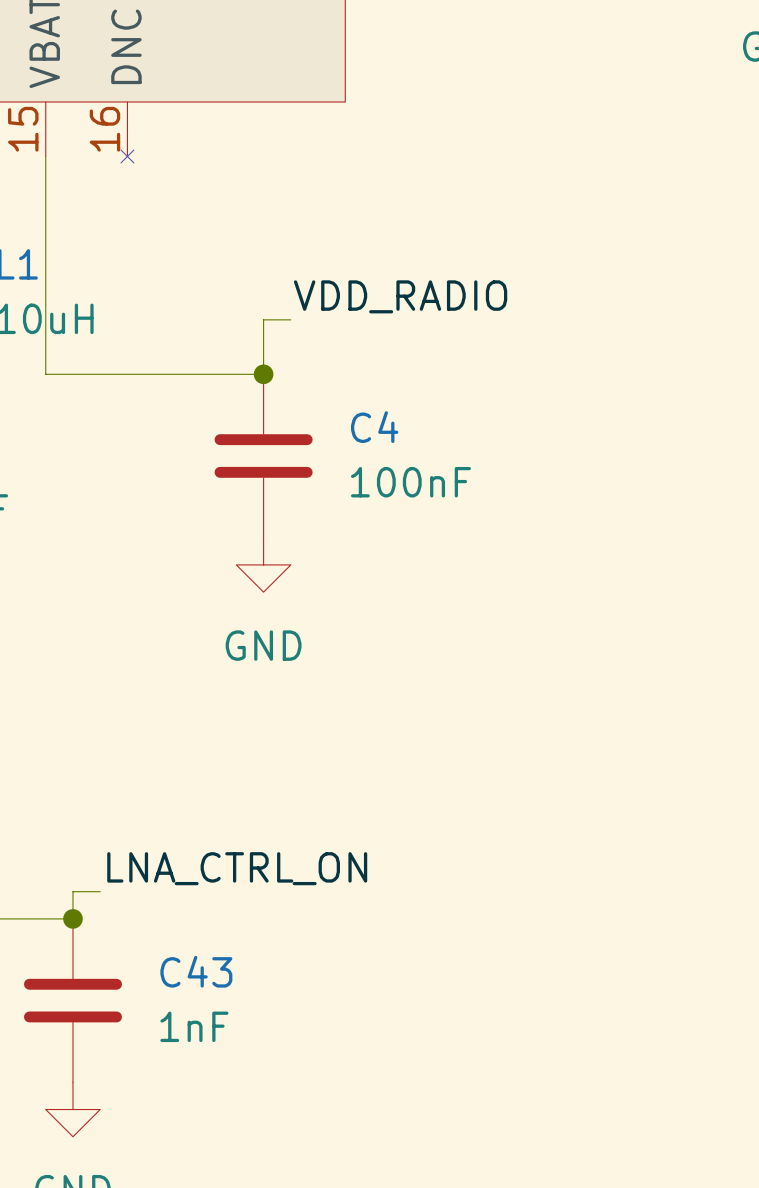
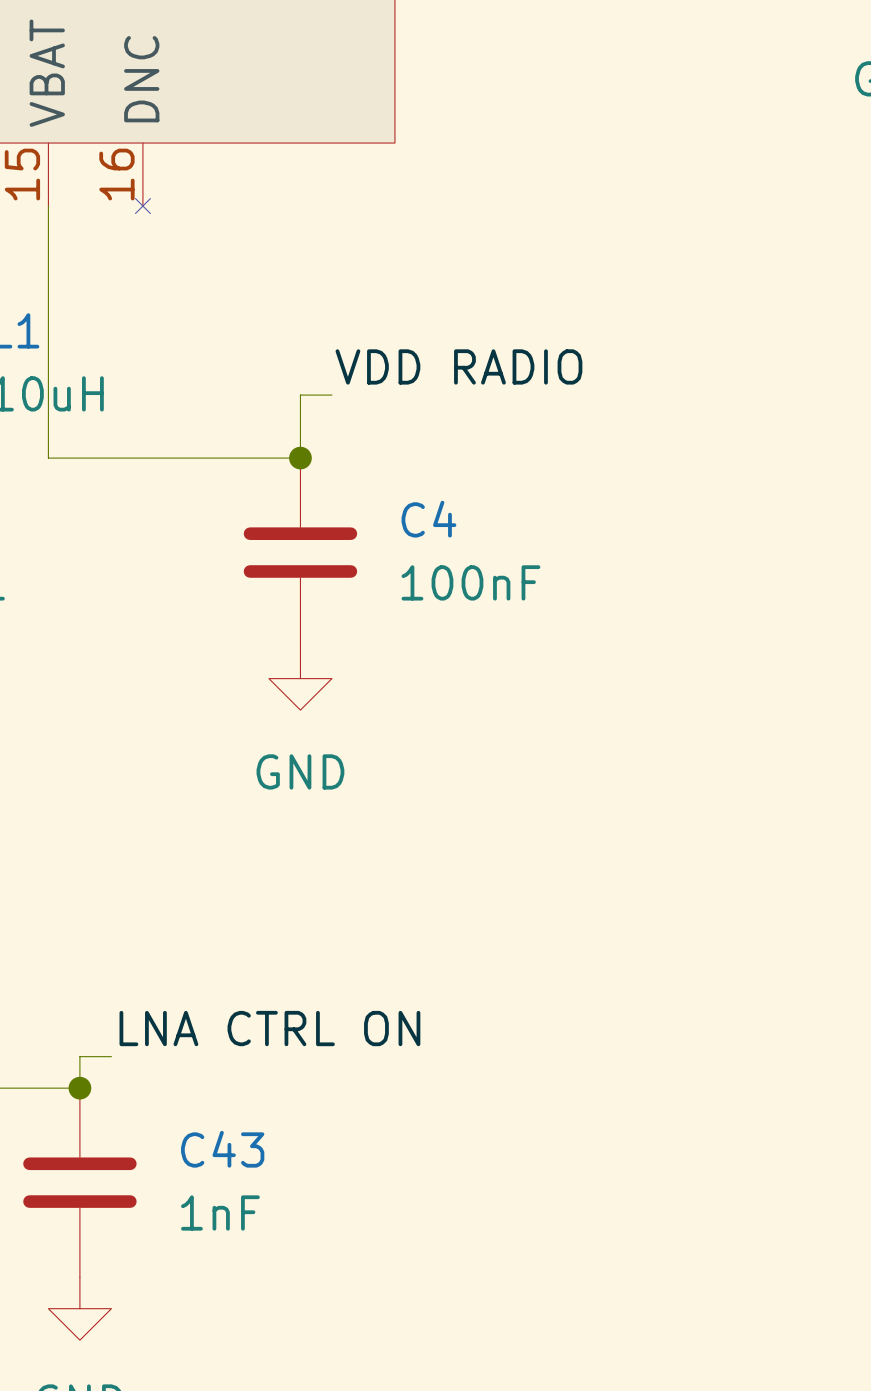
label: VDD_RADIO (400, 296) -> VDD RADIO (458, 366)
label: LNA_CTRL_ON (237, 868) -> LNA CTRL ON (269, 1028)

